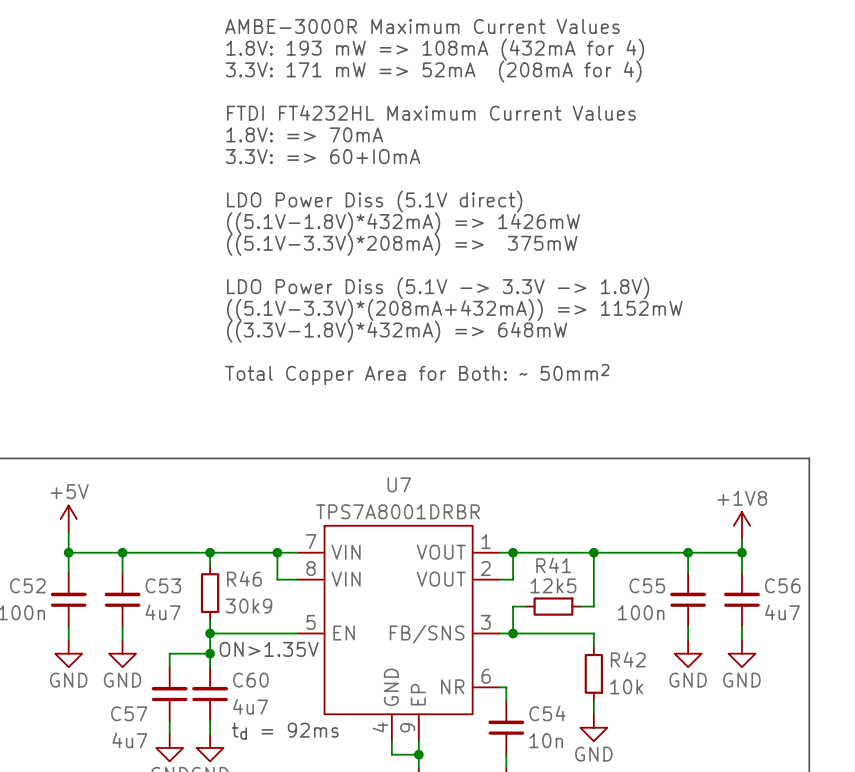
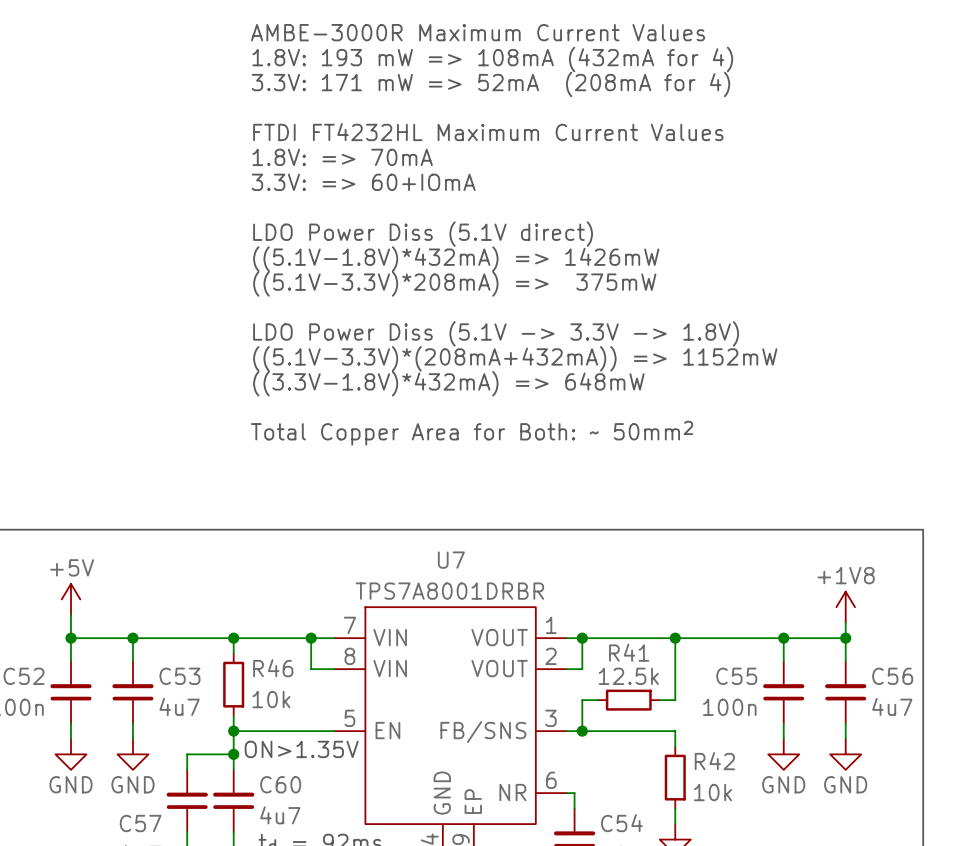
R41 value: 12k5 (553, 585) -> 12.5k (628, 676)
R46 value: 30k9 (248, 606) -> 10k (271, 699)

